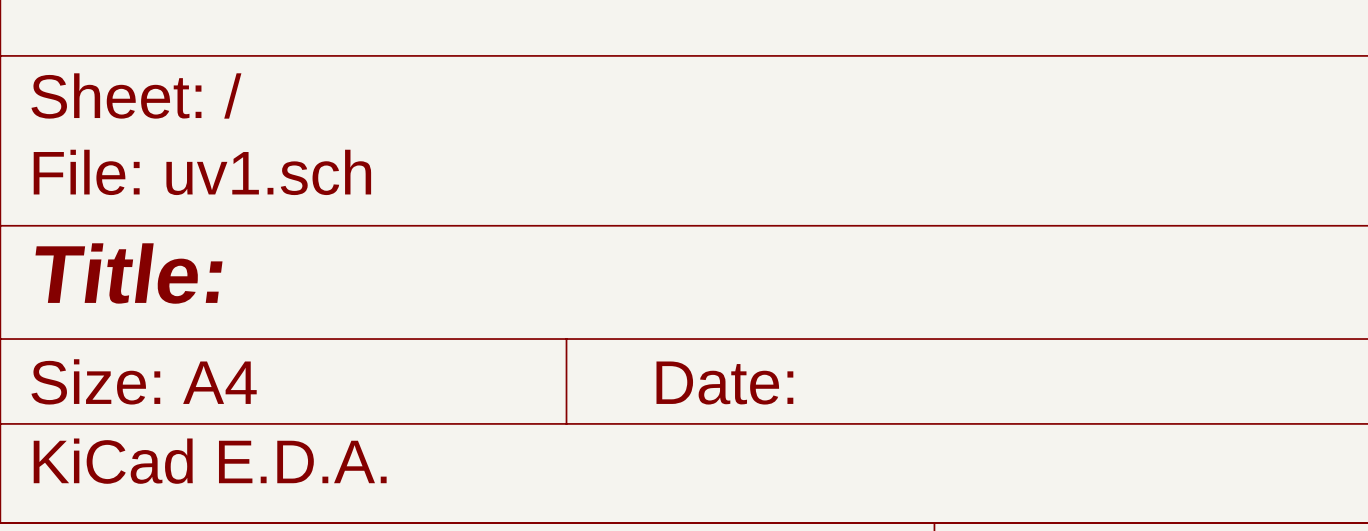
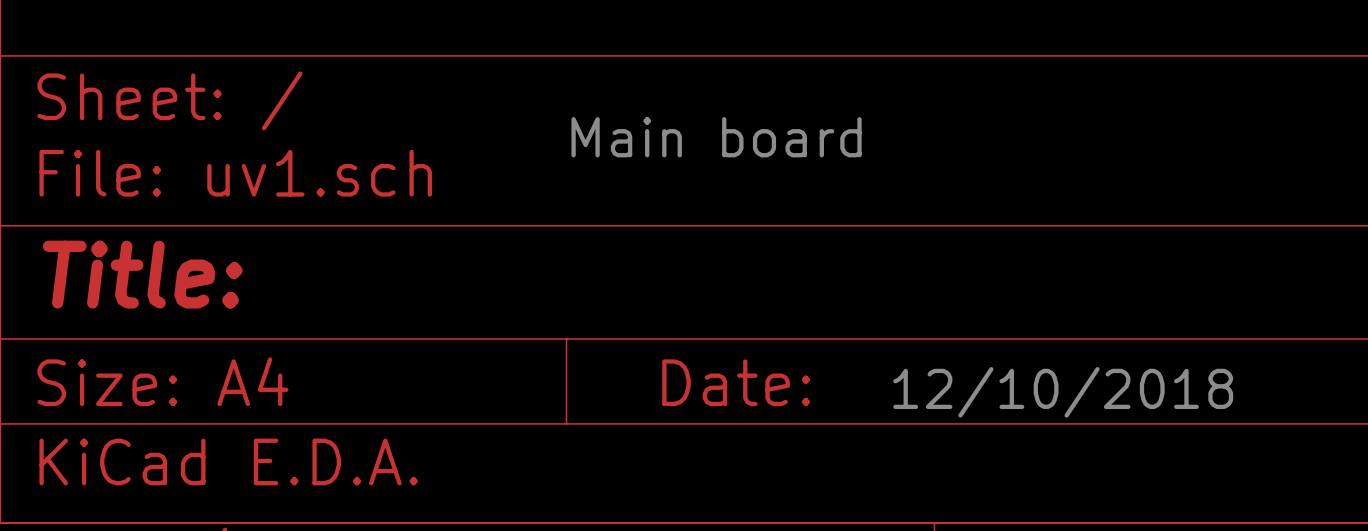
text: none -> Main board (716, 137)
text: none -> 12/10/2018 (1063, 392)

